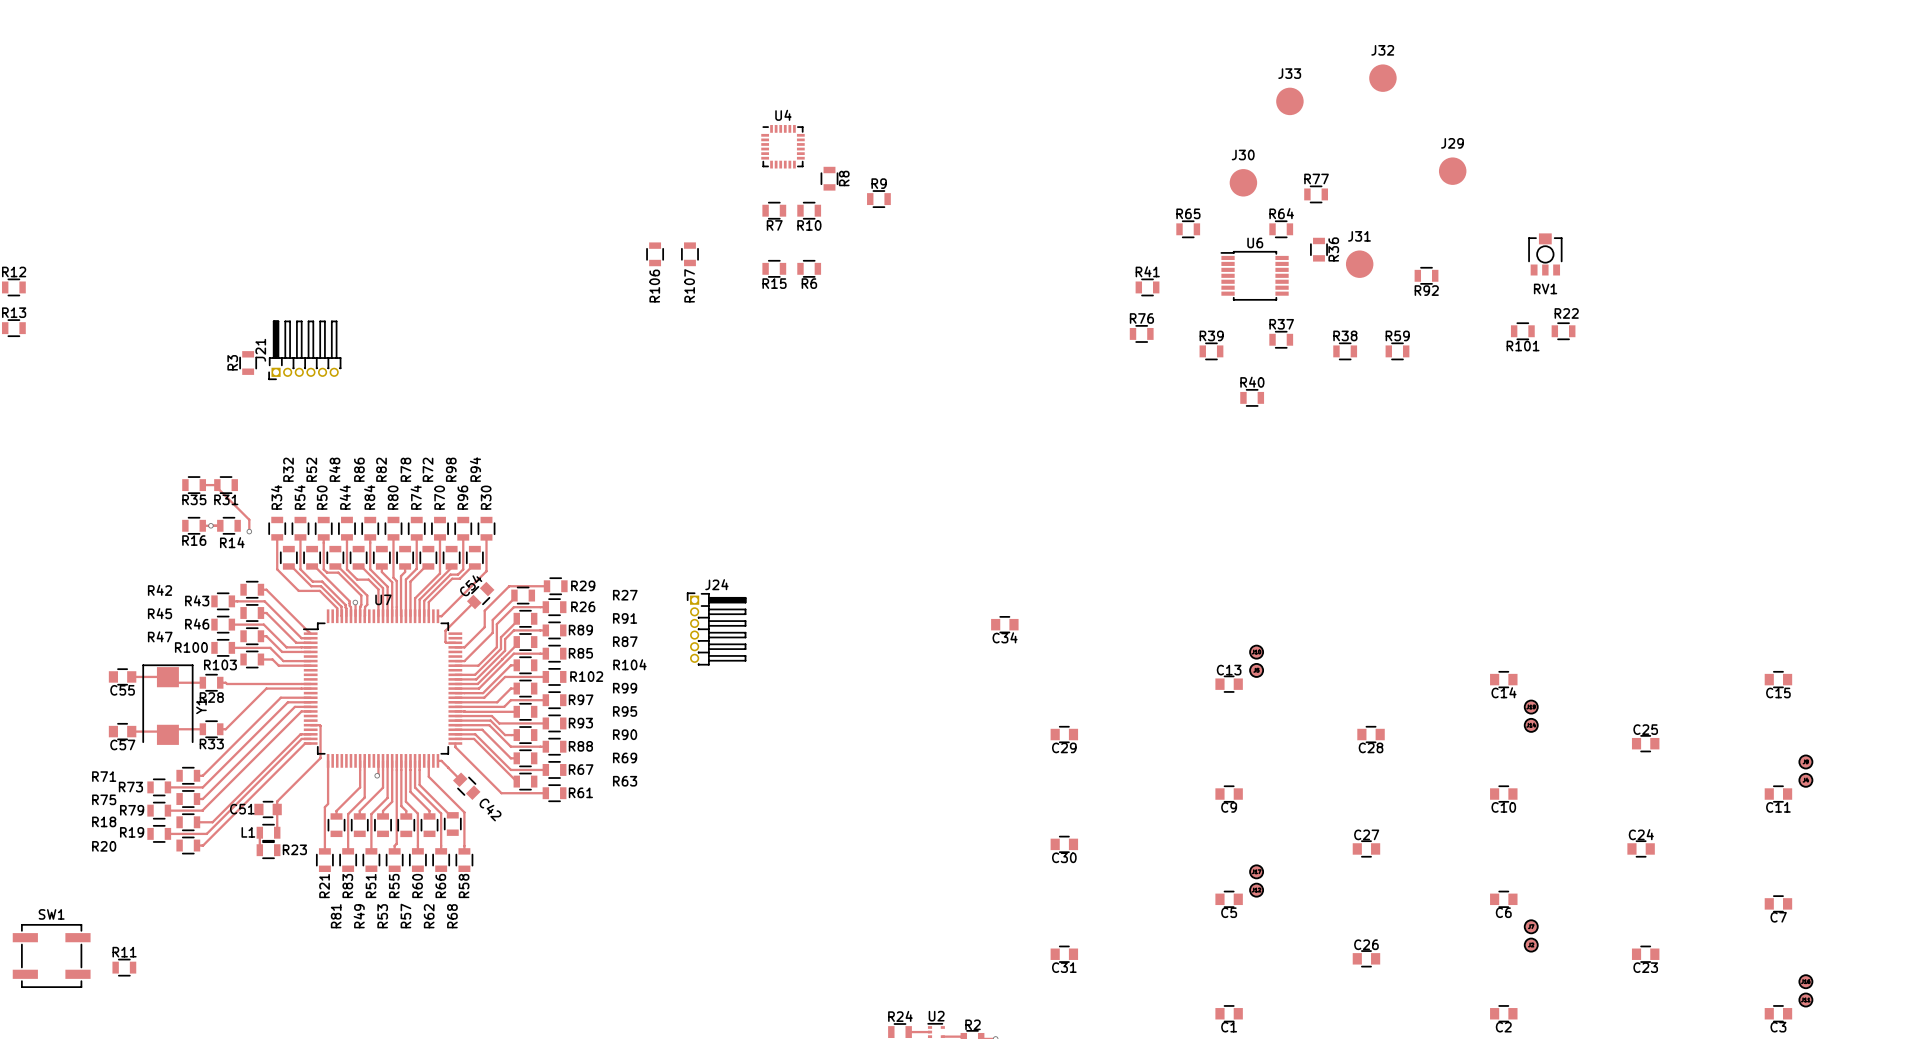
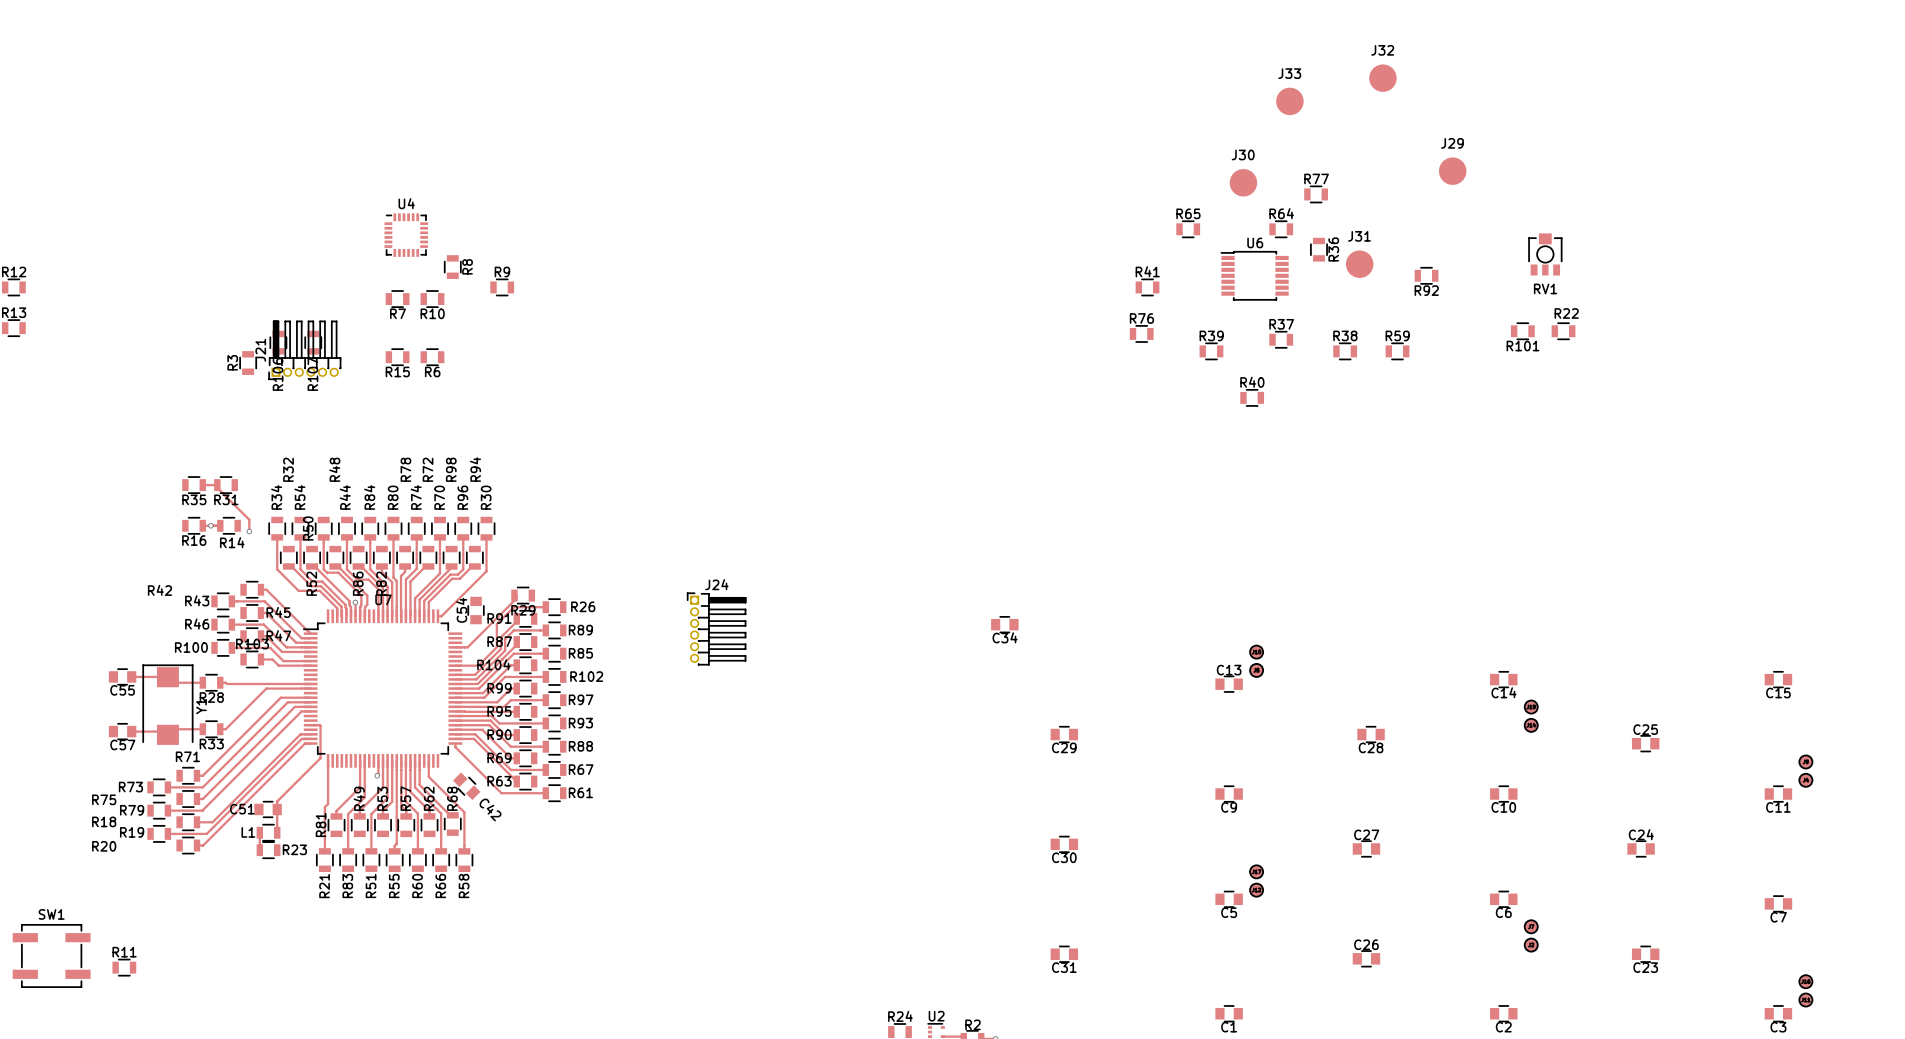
U4 position: (782, 146) -> (406, 235)
R8 position: (829, 178) -> (452, 267)
R9 position: (878, 199) -> (502, 287)
R7 position: (774, 210) -> (397, 299)
R10 position: (809, 210) -> (432, 299)
R106 position: (655, 254) -> (278, 342)
R107 position: (689, 254) -> (313, 342)
R15 position: (774, 268) -> (397, 357)
R6 position: (809, 268) -> (432, 357)
R52 name position: R52 (311, 469) -> R52 (311, 583)
R86 name position: R86 (359, 469) -> R86 (358, 583)
R82 name position: R82 (381, 469) -> R82 (381, 583)
R50 name position: R50 (322, 497) -> R50 (308, 528)
track: (547, 586) (509, 586) (484, 610) (484, 627) (464, 647) -> (516, 595) (516, 598) (467, 647) (464, 647)
R29: (555, 586) -> none
C54 rotation: 0° (480, 595) -> 45° counterclockwise (476, 610)
track: (514, 595) (514, 598) (492, 620) (492, 632) (464, 661) (455, 661) -> none
R27 name: R27 (625, 595) -> R29 (523, 610)
track: (474, 602) (445, 630) (445, 642) (455, 642) -> none
R45 name position: R45 (160, 613) -> R45 (278, 612)
R91 name position: R91 (625, 618) -> R91 (499, 618)
R47 name position: R47 (160, 636) -> R47 (278, 635)
R87 name position: R87 (625, 641) -> R87 (499, 641)
R103 name position: R103 (220, 664) -> R103 (252, 644)
R104 name position: R104 (629, 664) -> R104 (493, 664)
R99 name position: R99 (625, 688) -> R99 (499, 688)
R95 name position: R95 (625, 711) -> R95 (499, 711)
R90 name position: R90 (625, 734) -> R90 (499, 734)
R69 name position: R69 (625, 757) -> R69 (499, 757)
track: (437, 760) (441, 760) (448, 767) -> none
track: (448, 767) (460, 779) -> none
R71 name position: R71 (104, 776) -> R71 (187, 756)
R63 name position: R63 (625, 781) -> R63 (499, 781)
R81 name position: R81 (336, 916) -> R81 (321, 824)
R49 name position: R49 (359, 916) -> R49 (359, 798)
R53 name position: R53 (382, 916) -> R53 (382, 798)
R57 name position: R57 (405, 916) -> R57 (405, 798)
R62 name position: R62 (429, 916) -> R62 (429, 798)
R68 name position: R68 (452, 916) -> R68 (452, 798)
track: (908, 1032) (930, 1032) -> none

